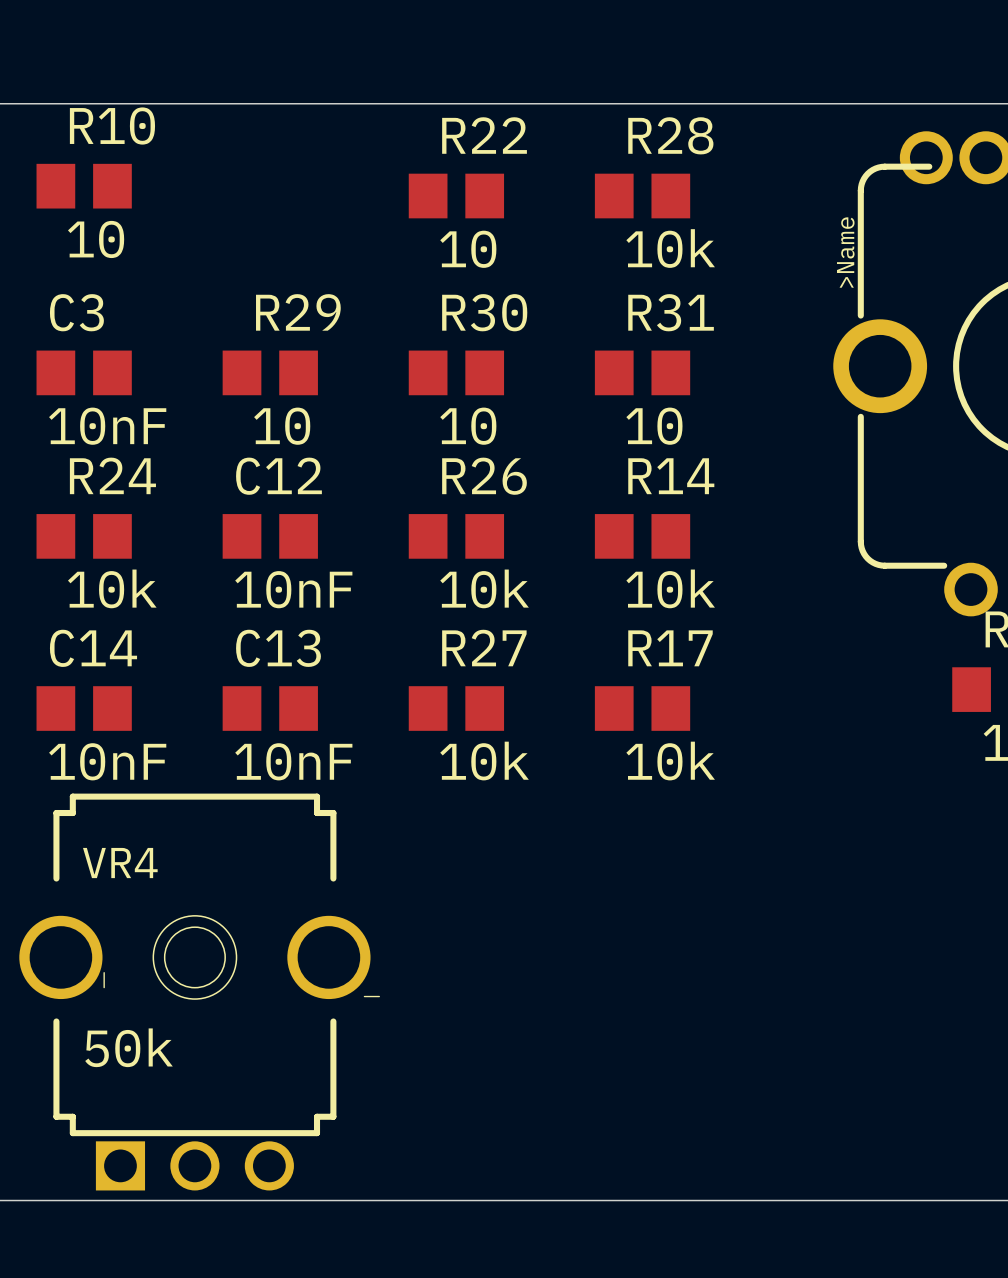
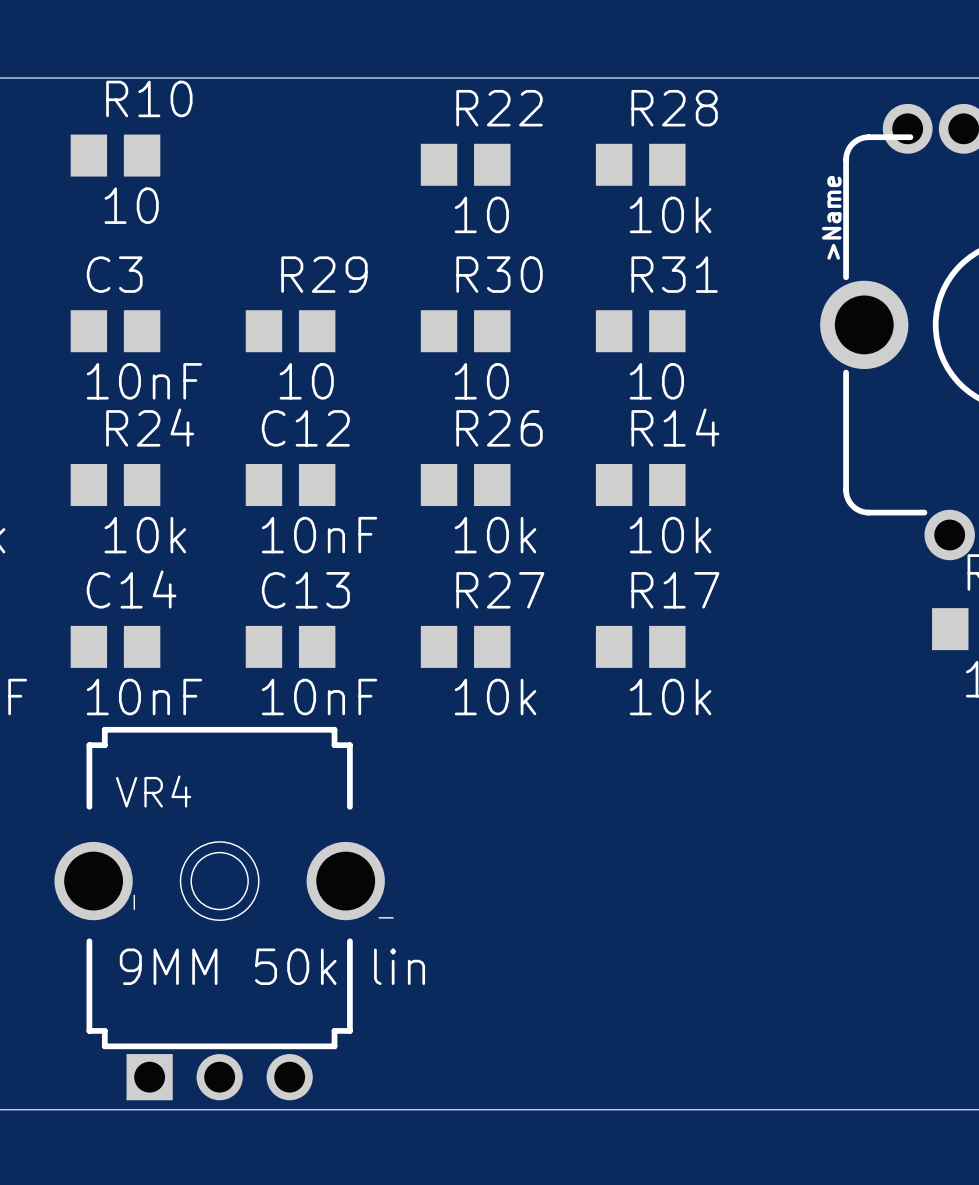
VR4 value: 50k (129, 1047) -> 9MM 50k lin (272, 966)

